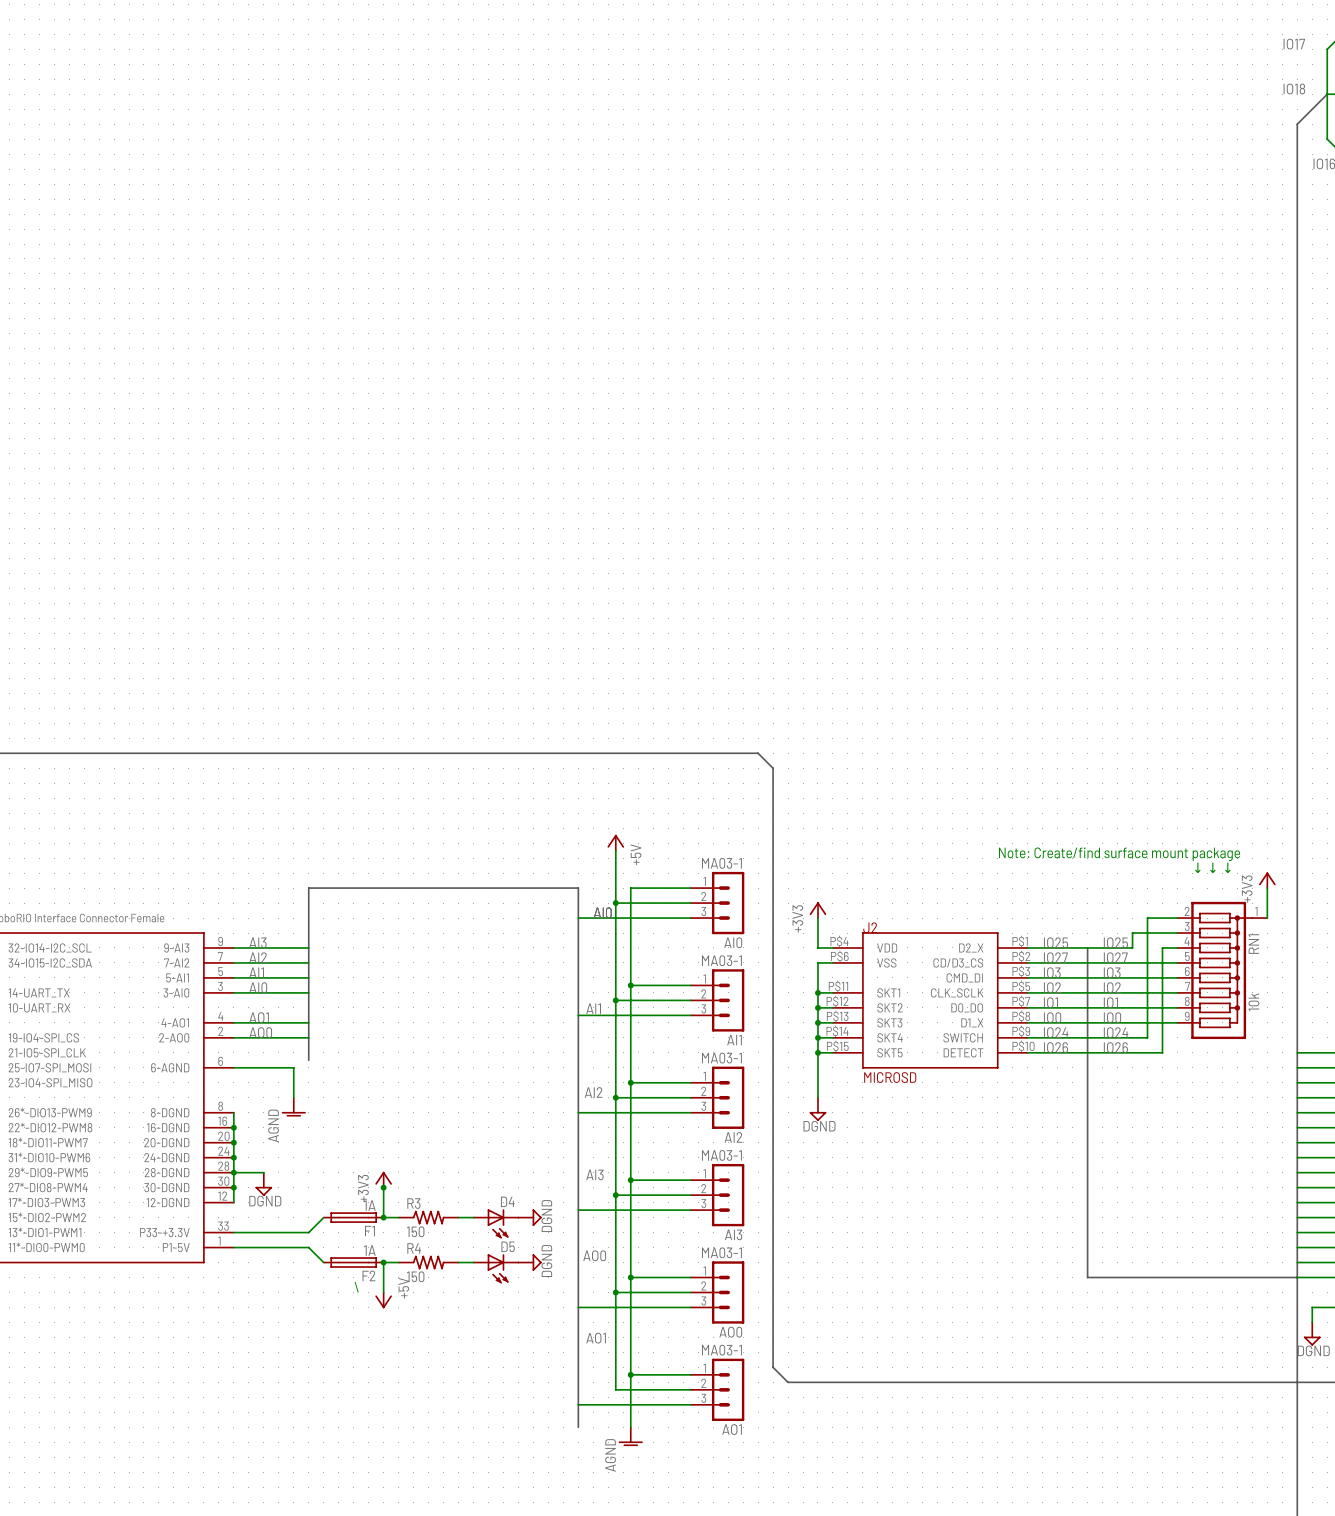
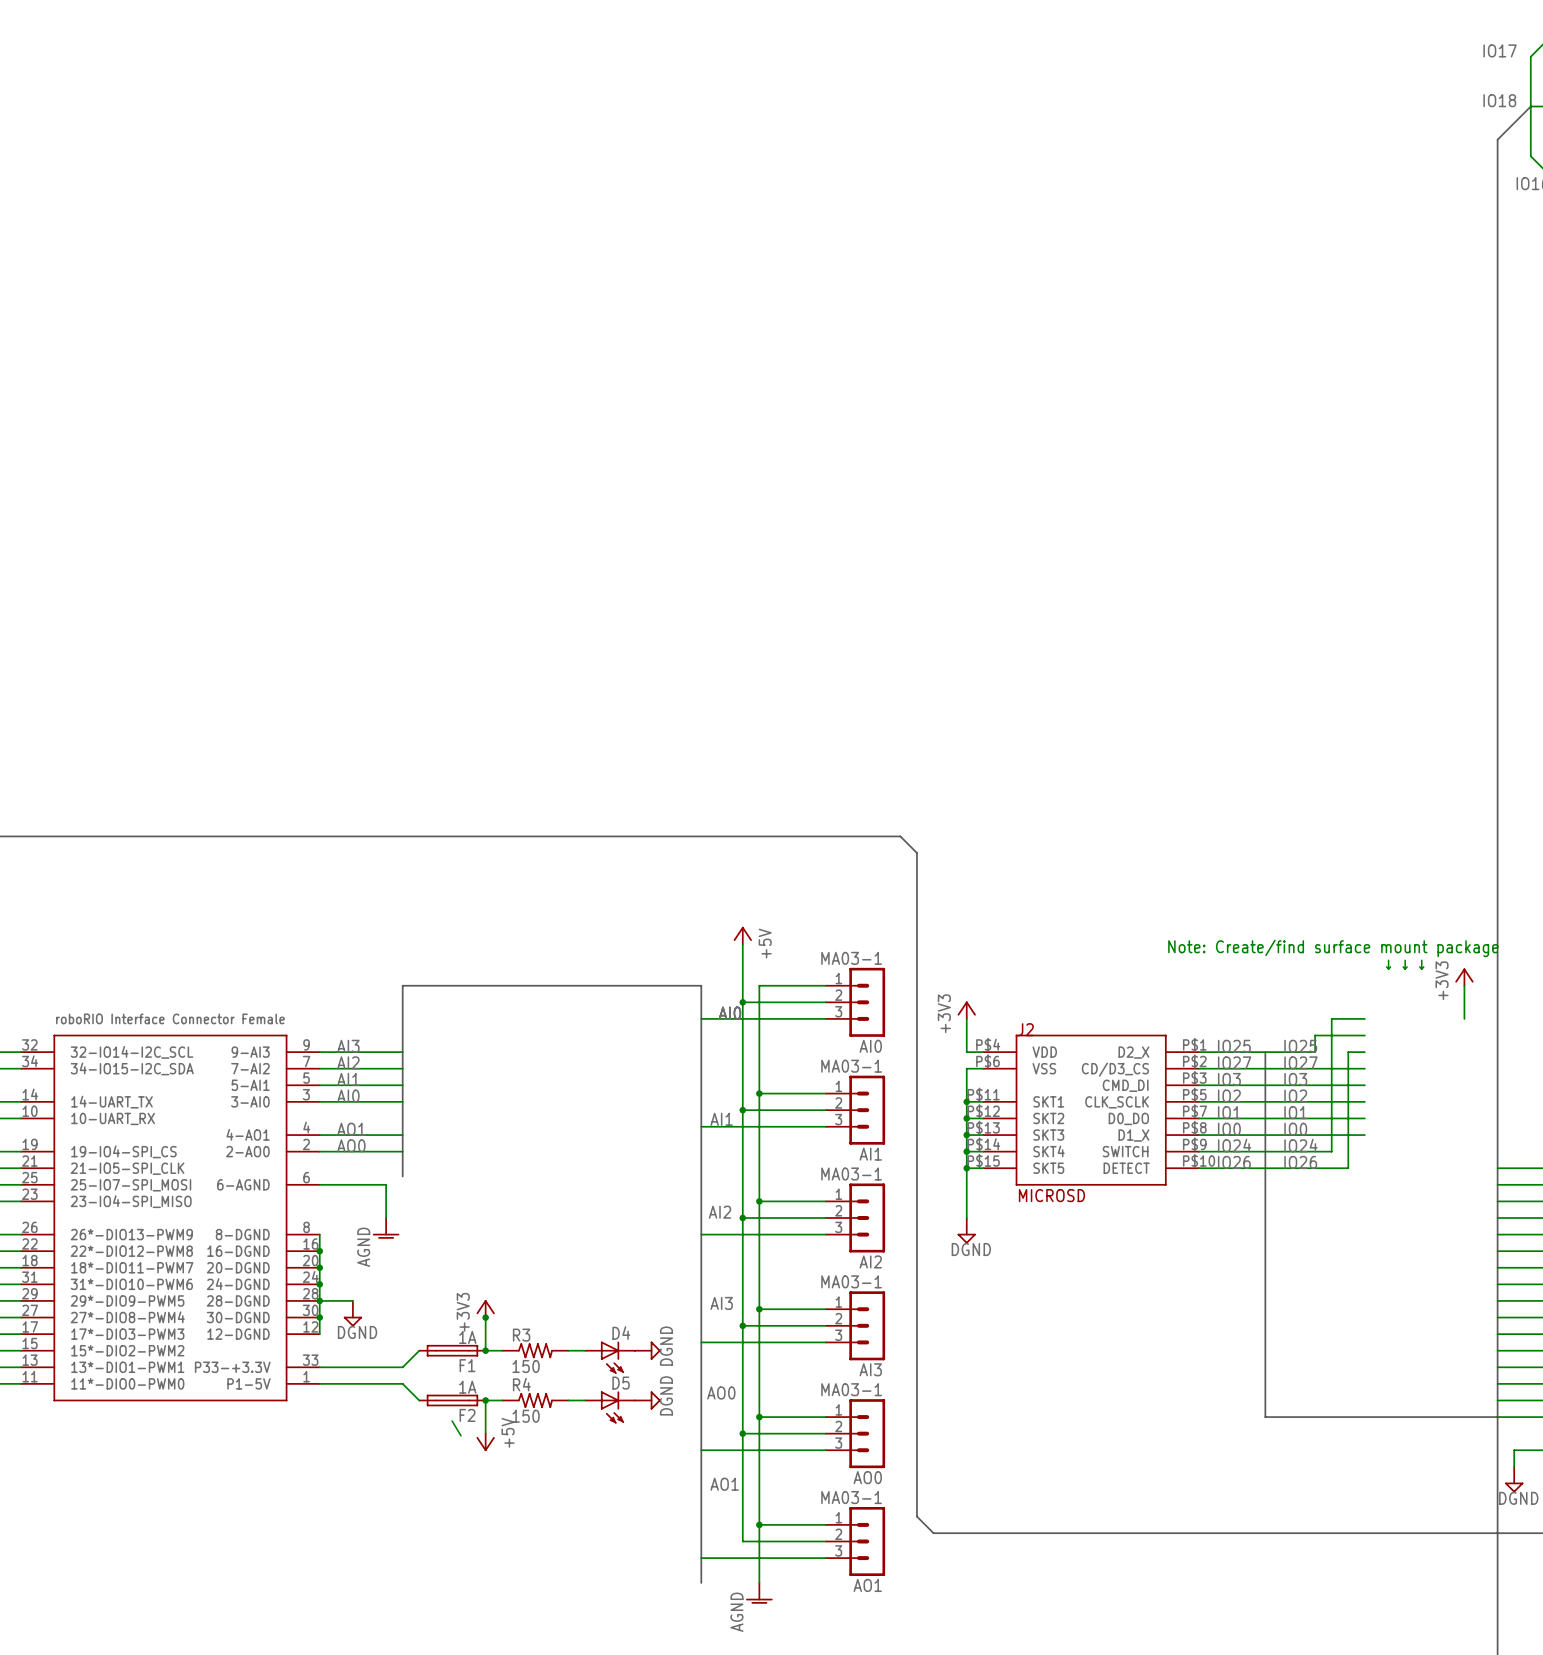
RN1: 10k (1222, 970) -> none

